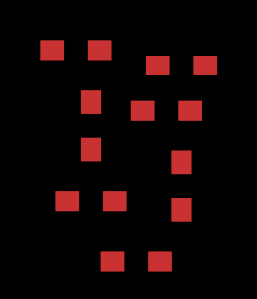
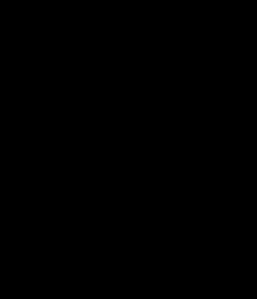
part: (75, 50) -> none
part: (181, 65) -> none
part: (166, 110) -> none
part: (91, 125) -> none
part: (181, 186) -> none
part: (91, 201) -> none
part: (136, 261) -> none

